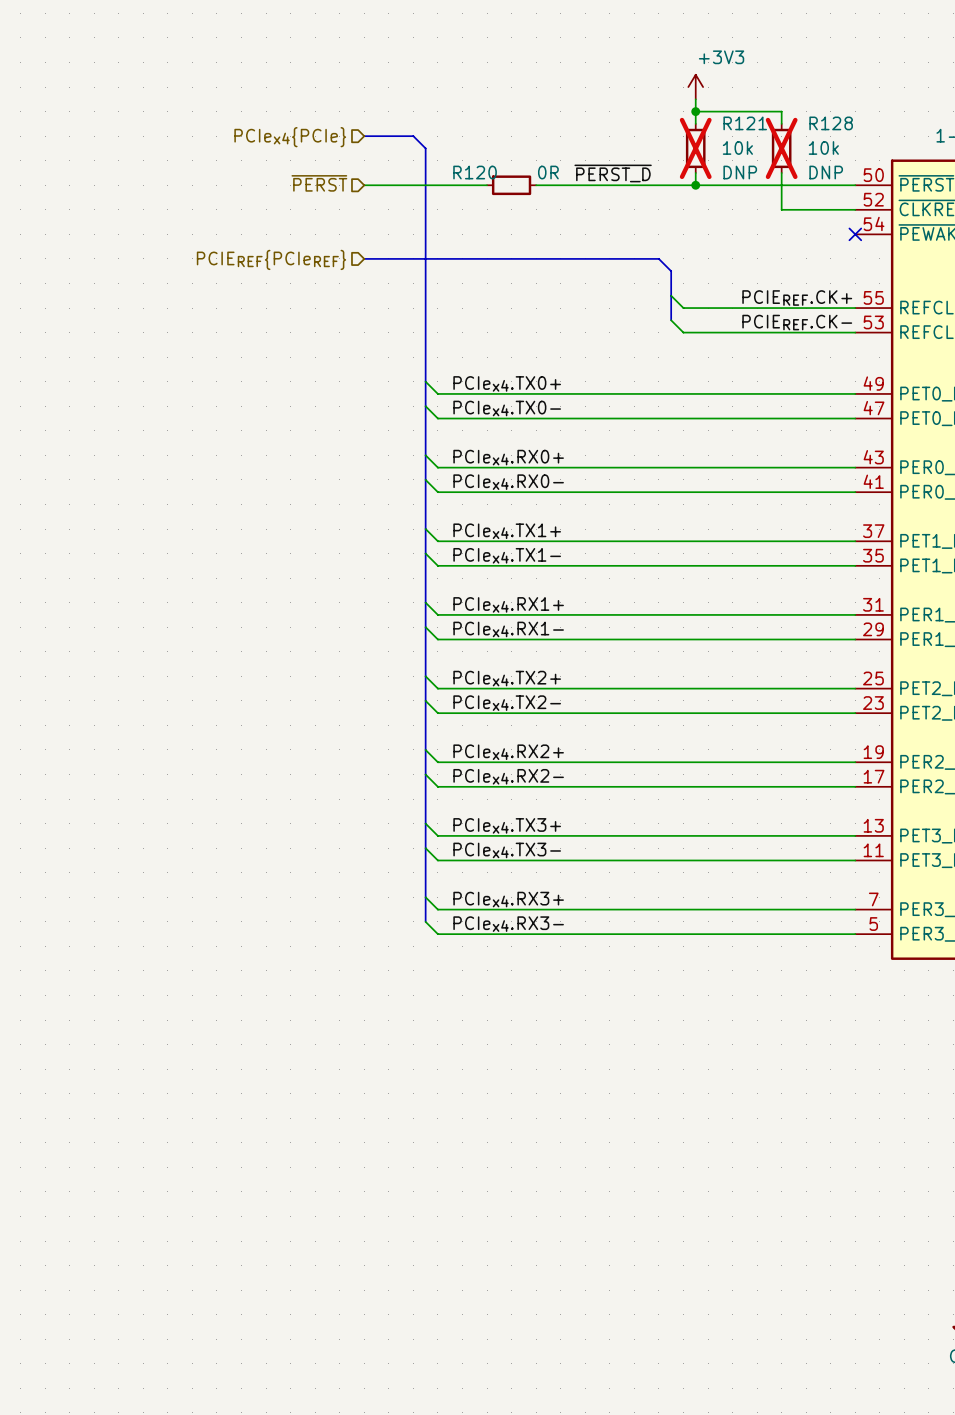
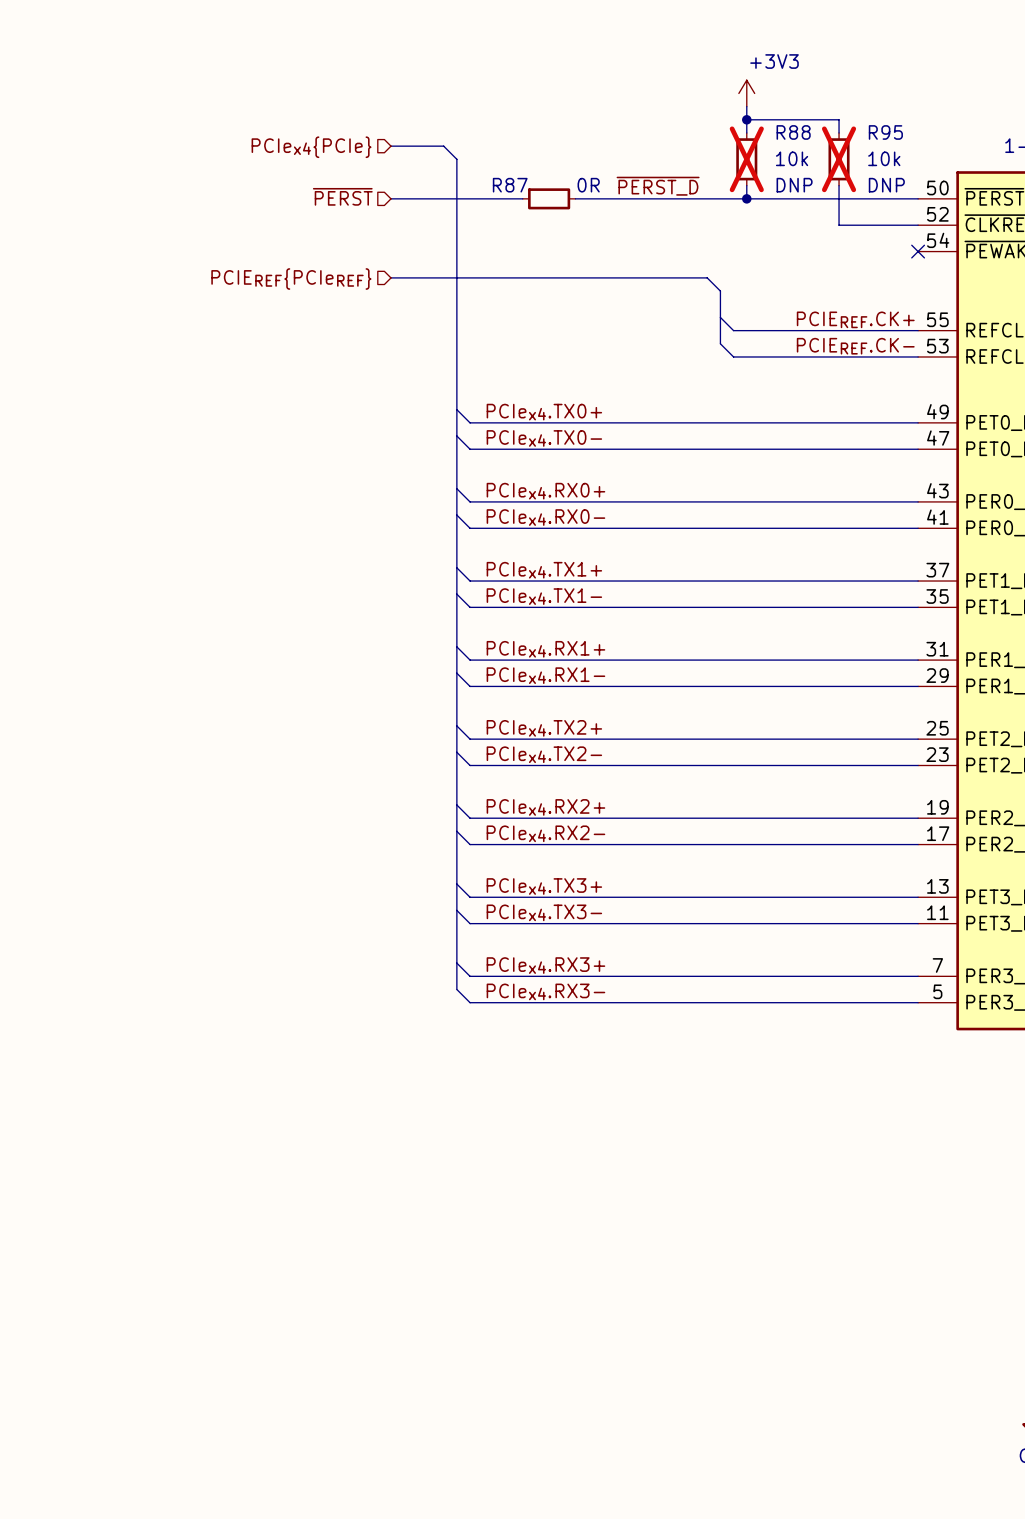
R121 name: R121 (745, 123) -> R88 (793, 132)
R128 name: R128 (831, 123) -> R95 (885, 132)
R120 name: R120 (475, 172) -> R87 (510, 185)

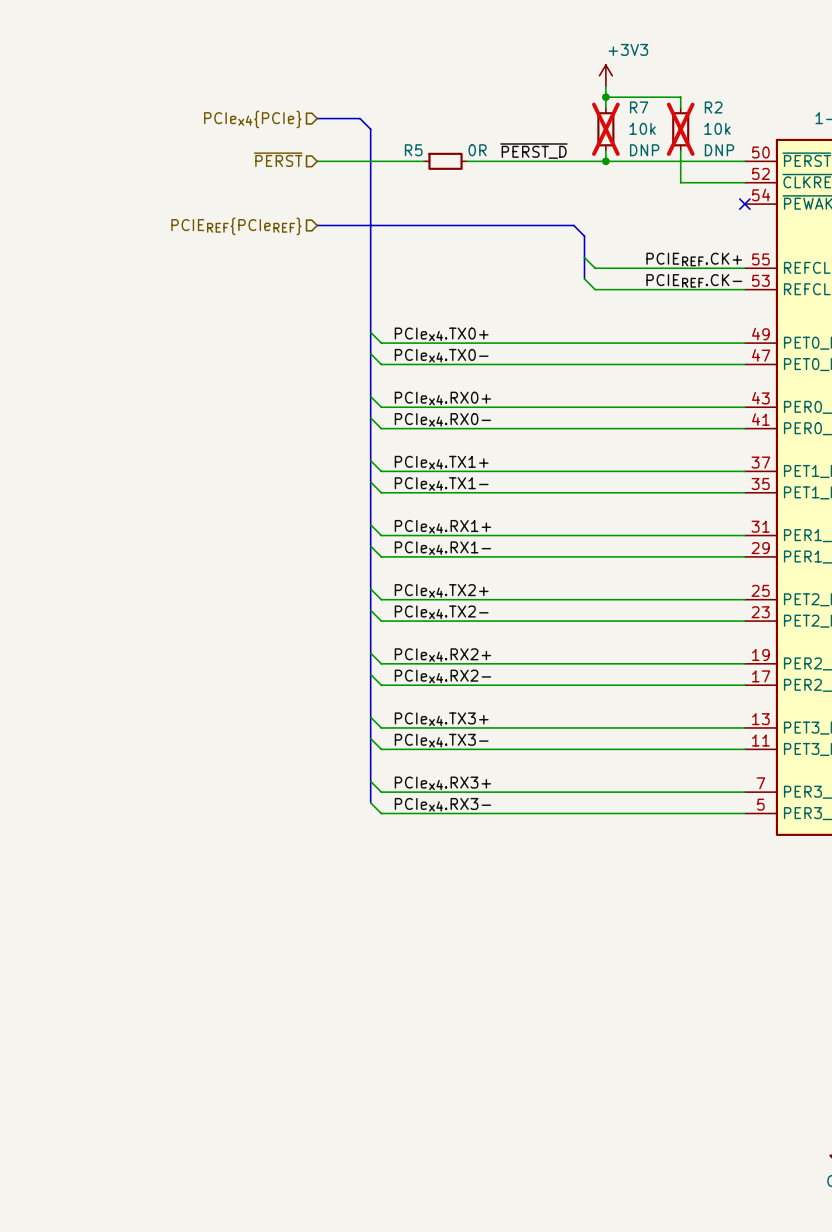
R88 name: R88 (793, 132) -> R7 (639, 107)
R95 name: R95 (885, 132) -> R2 (713, 107)
R87 name: R87 (510, 185) -> R5 (413, 150)

